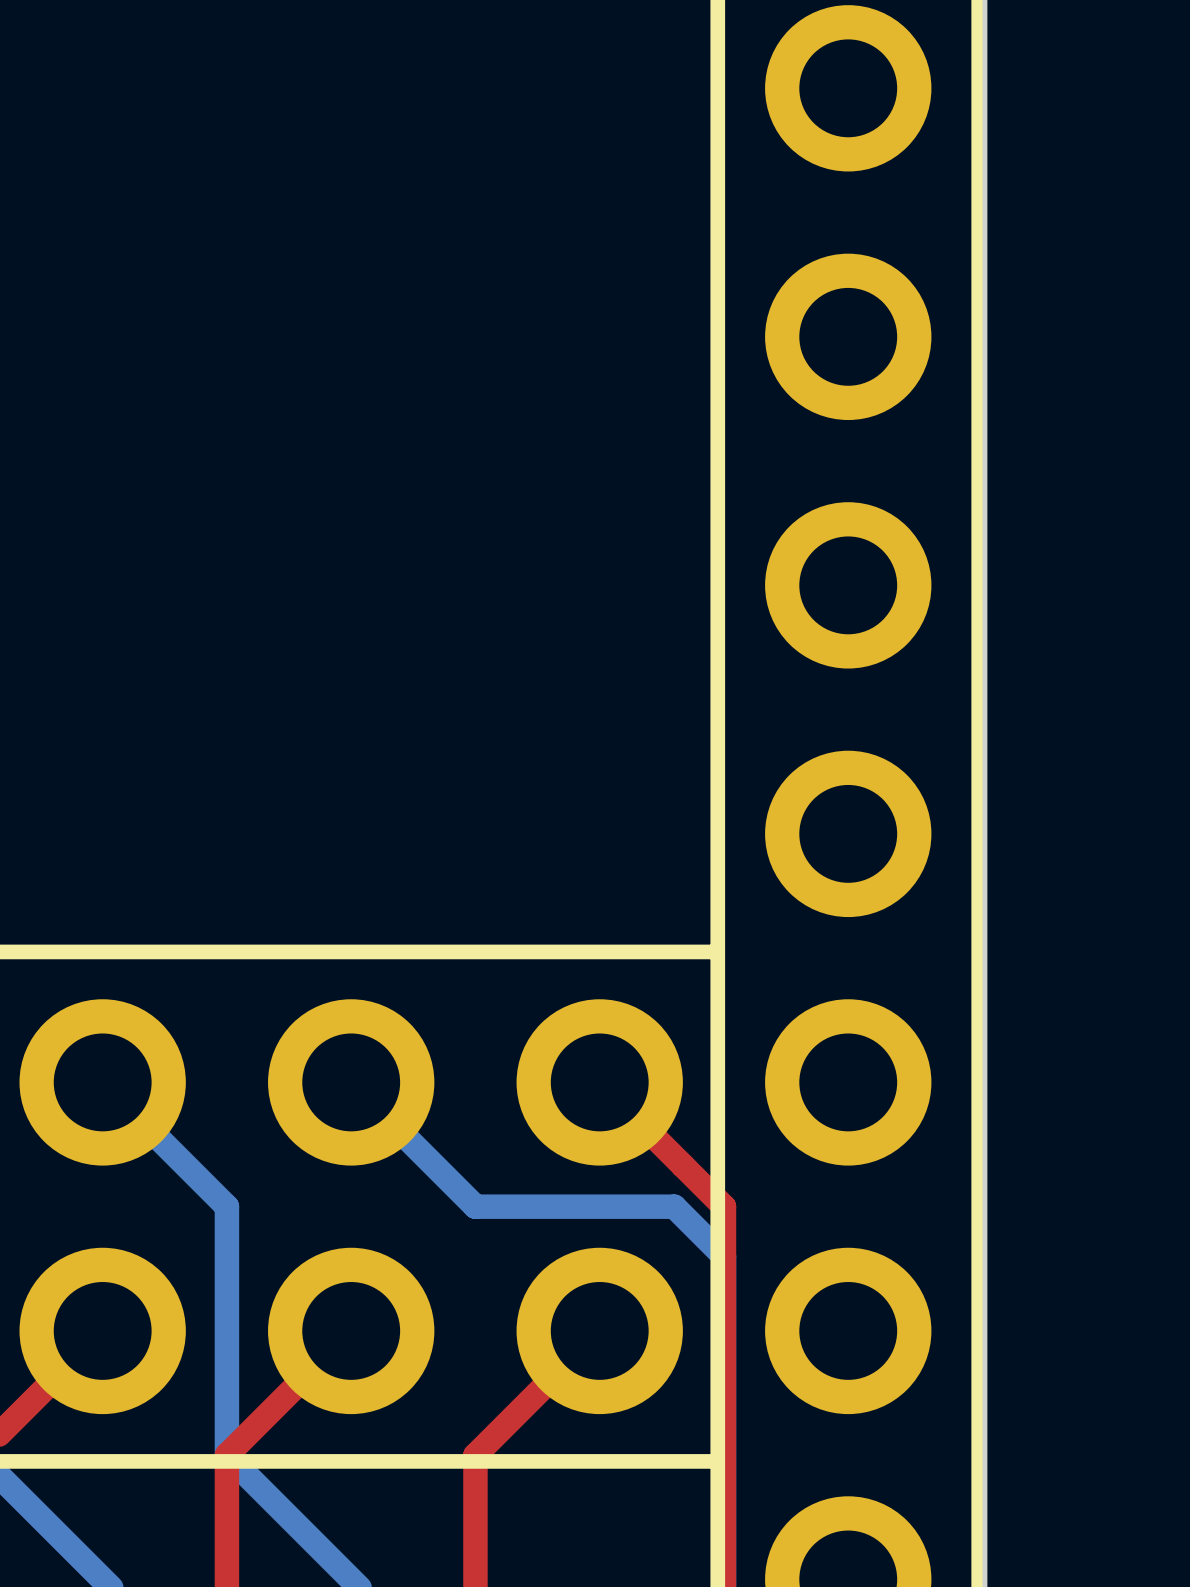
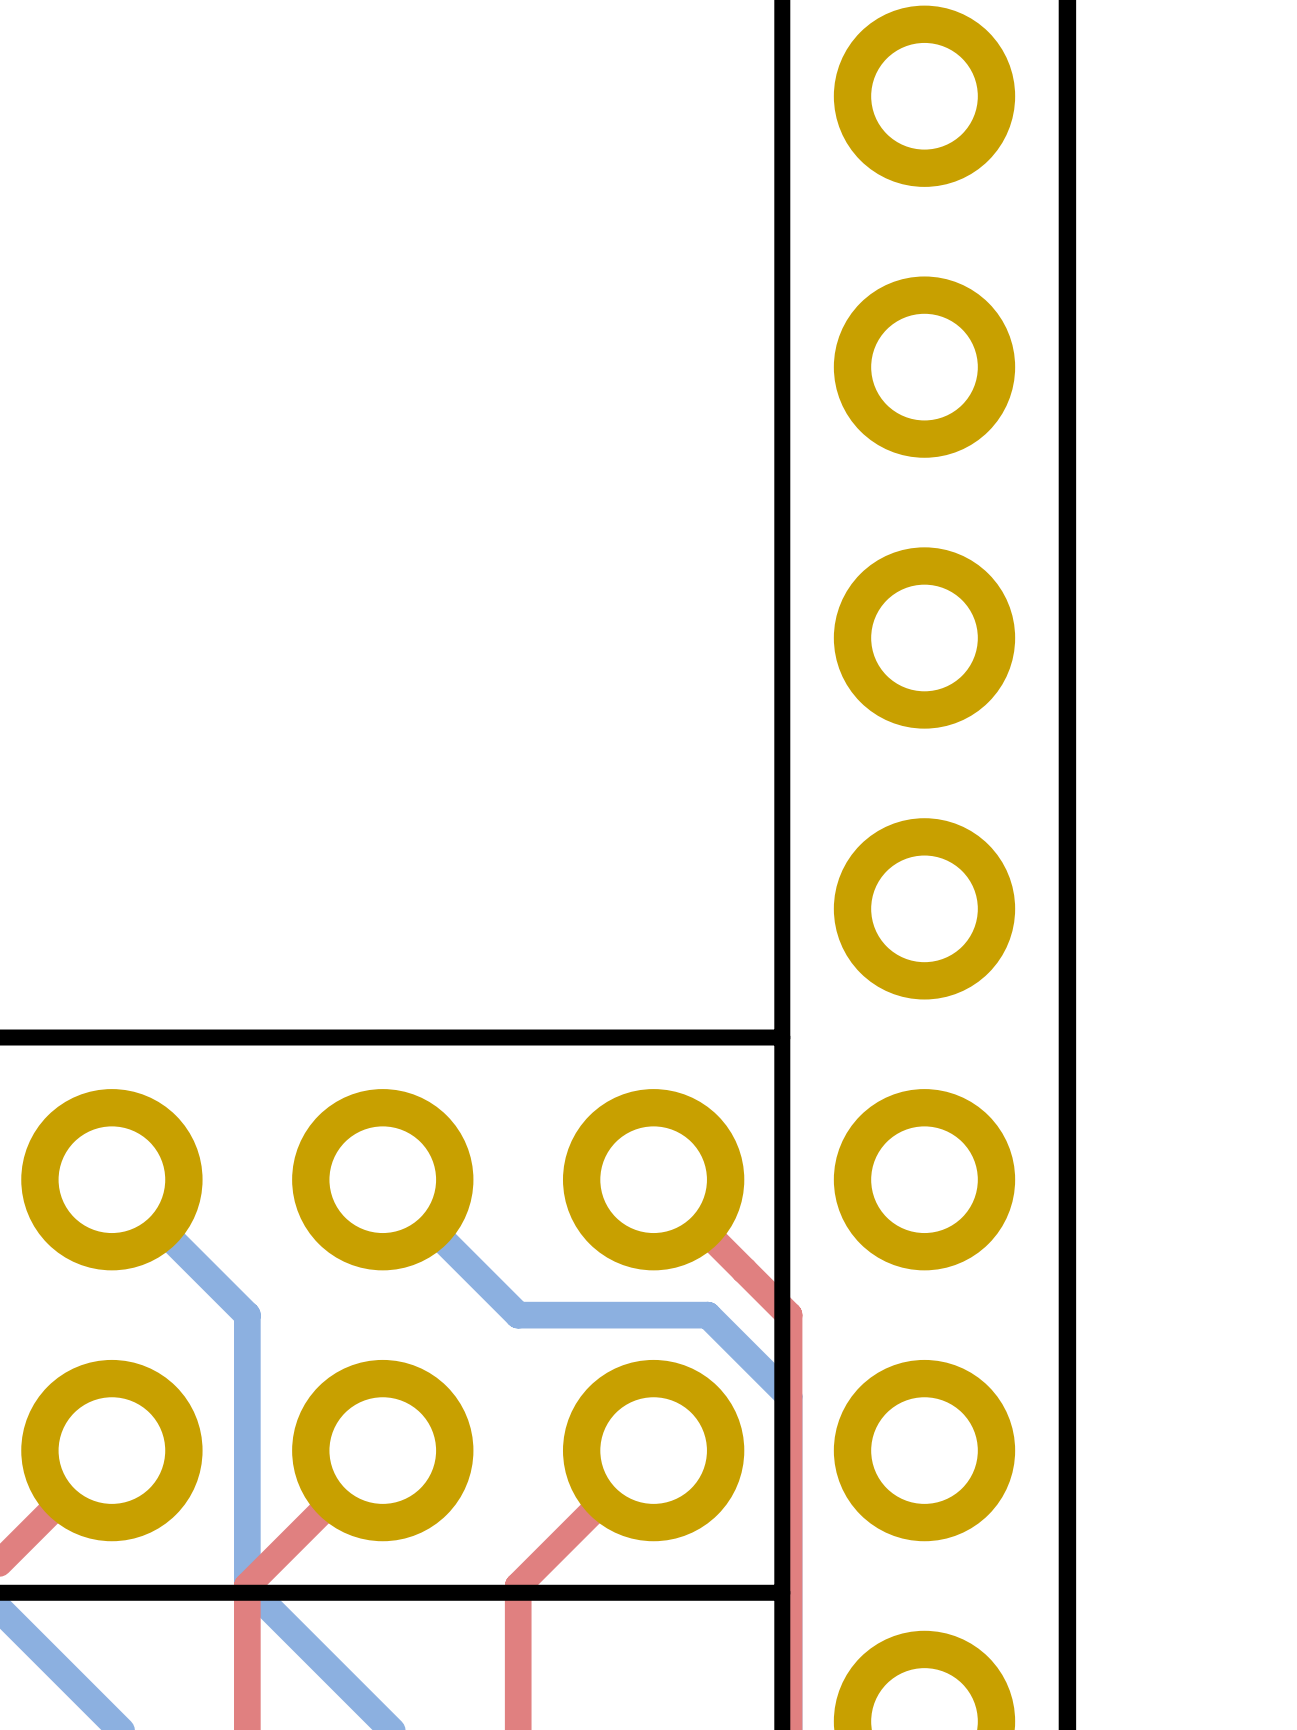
bottom track: (649, 1206) (674, 1206) (723, 1256) (723, 1281) -> (707, 1315) (789, 1396)

